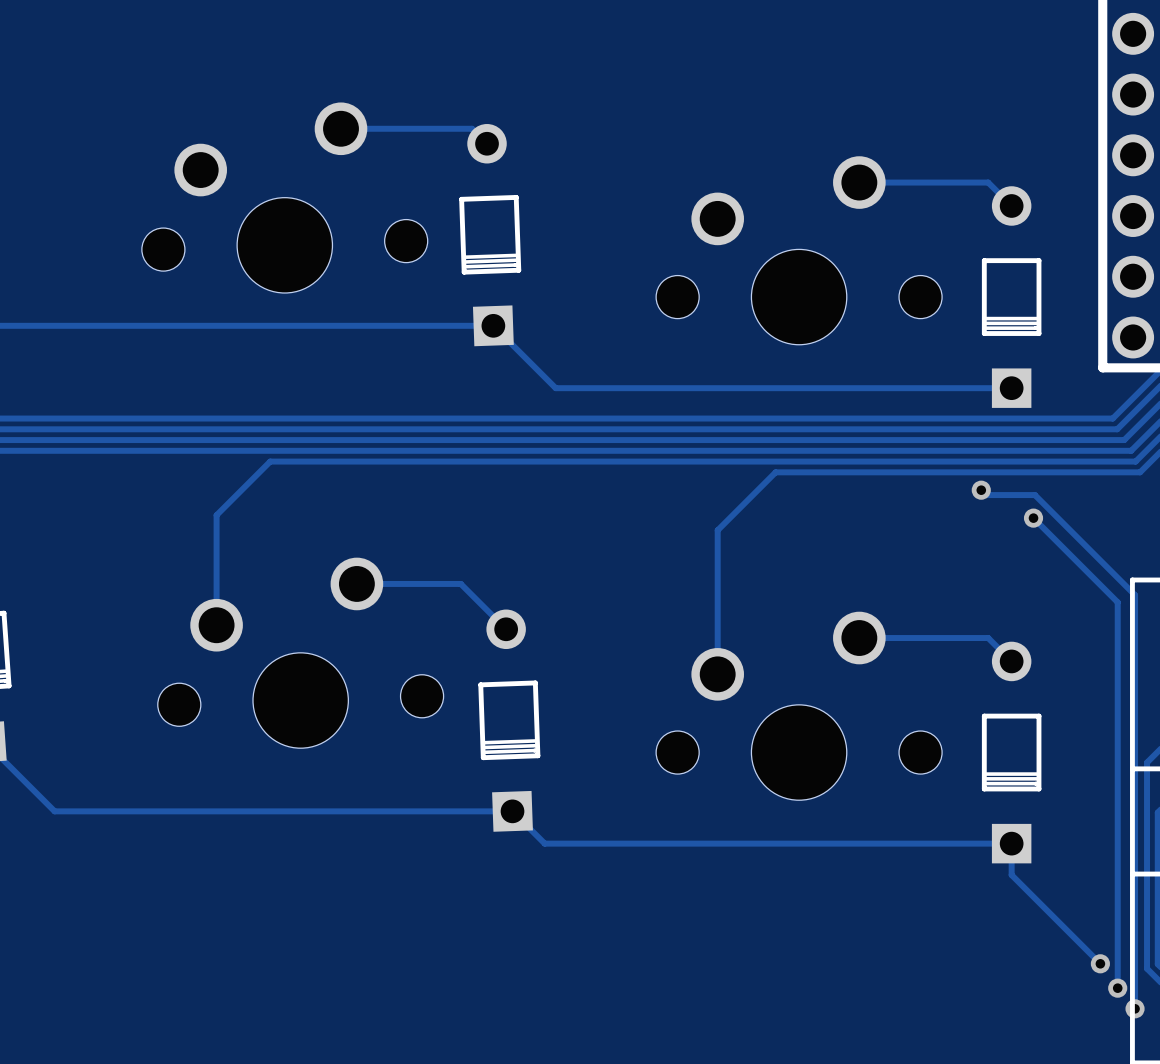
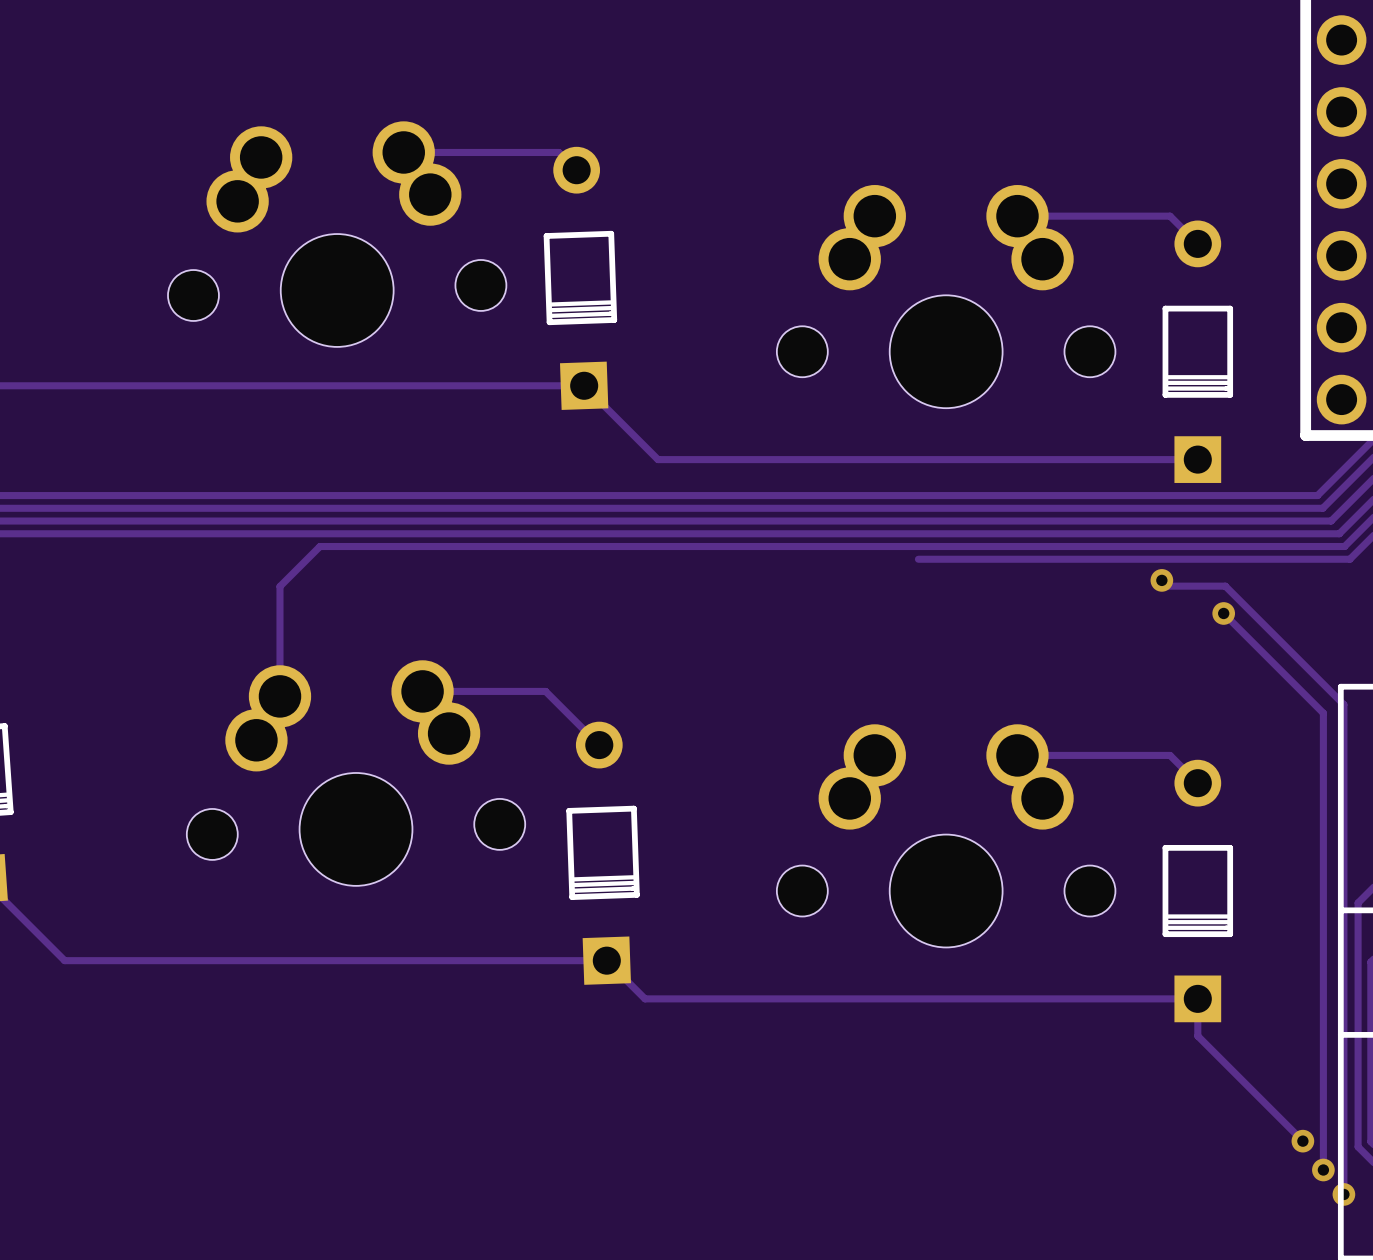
part footprint: [141, 102, 428, 294] -> [167, 121, 507, 347]
part footprint: [656, 156, 943, 345] -> [776, 185, 1116, 409]
track: (775, 472) (717, 530) (717, 674) -> none
track: (236, 495) (216, 515) (216, 625) -> (279, 586) (279, 696)
part footprint: [157, 557, 444, 749] -> [186, 660, 526, 886]
part footprint: [656, 611, 943, 801] -> [776, 724, 1116, 948]

